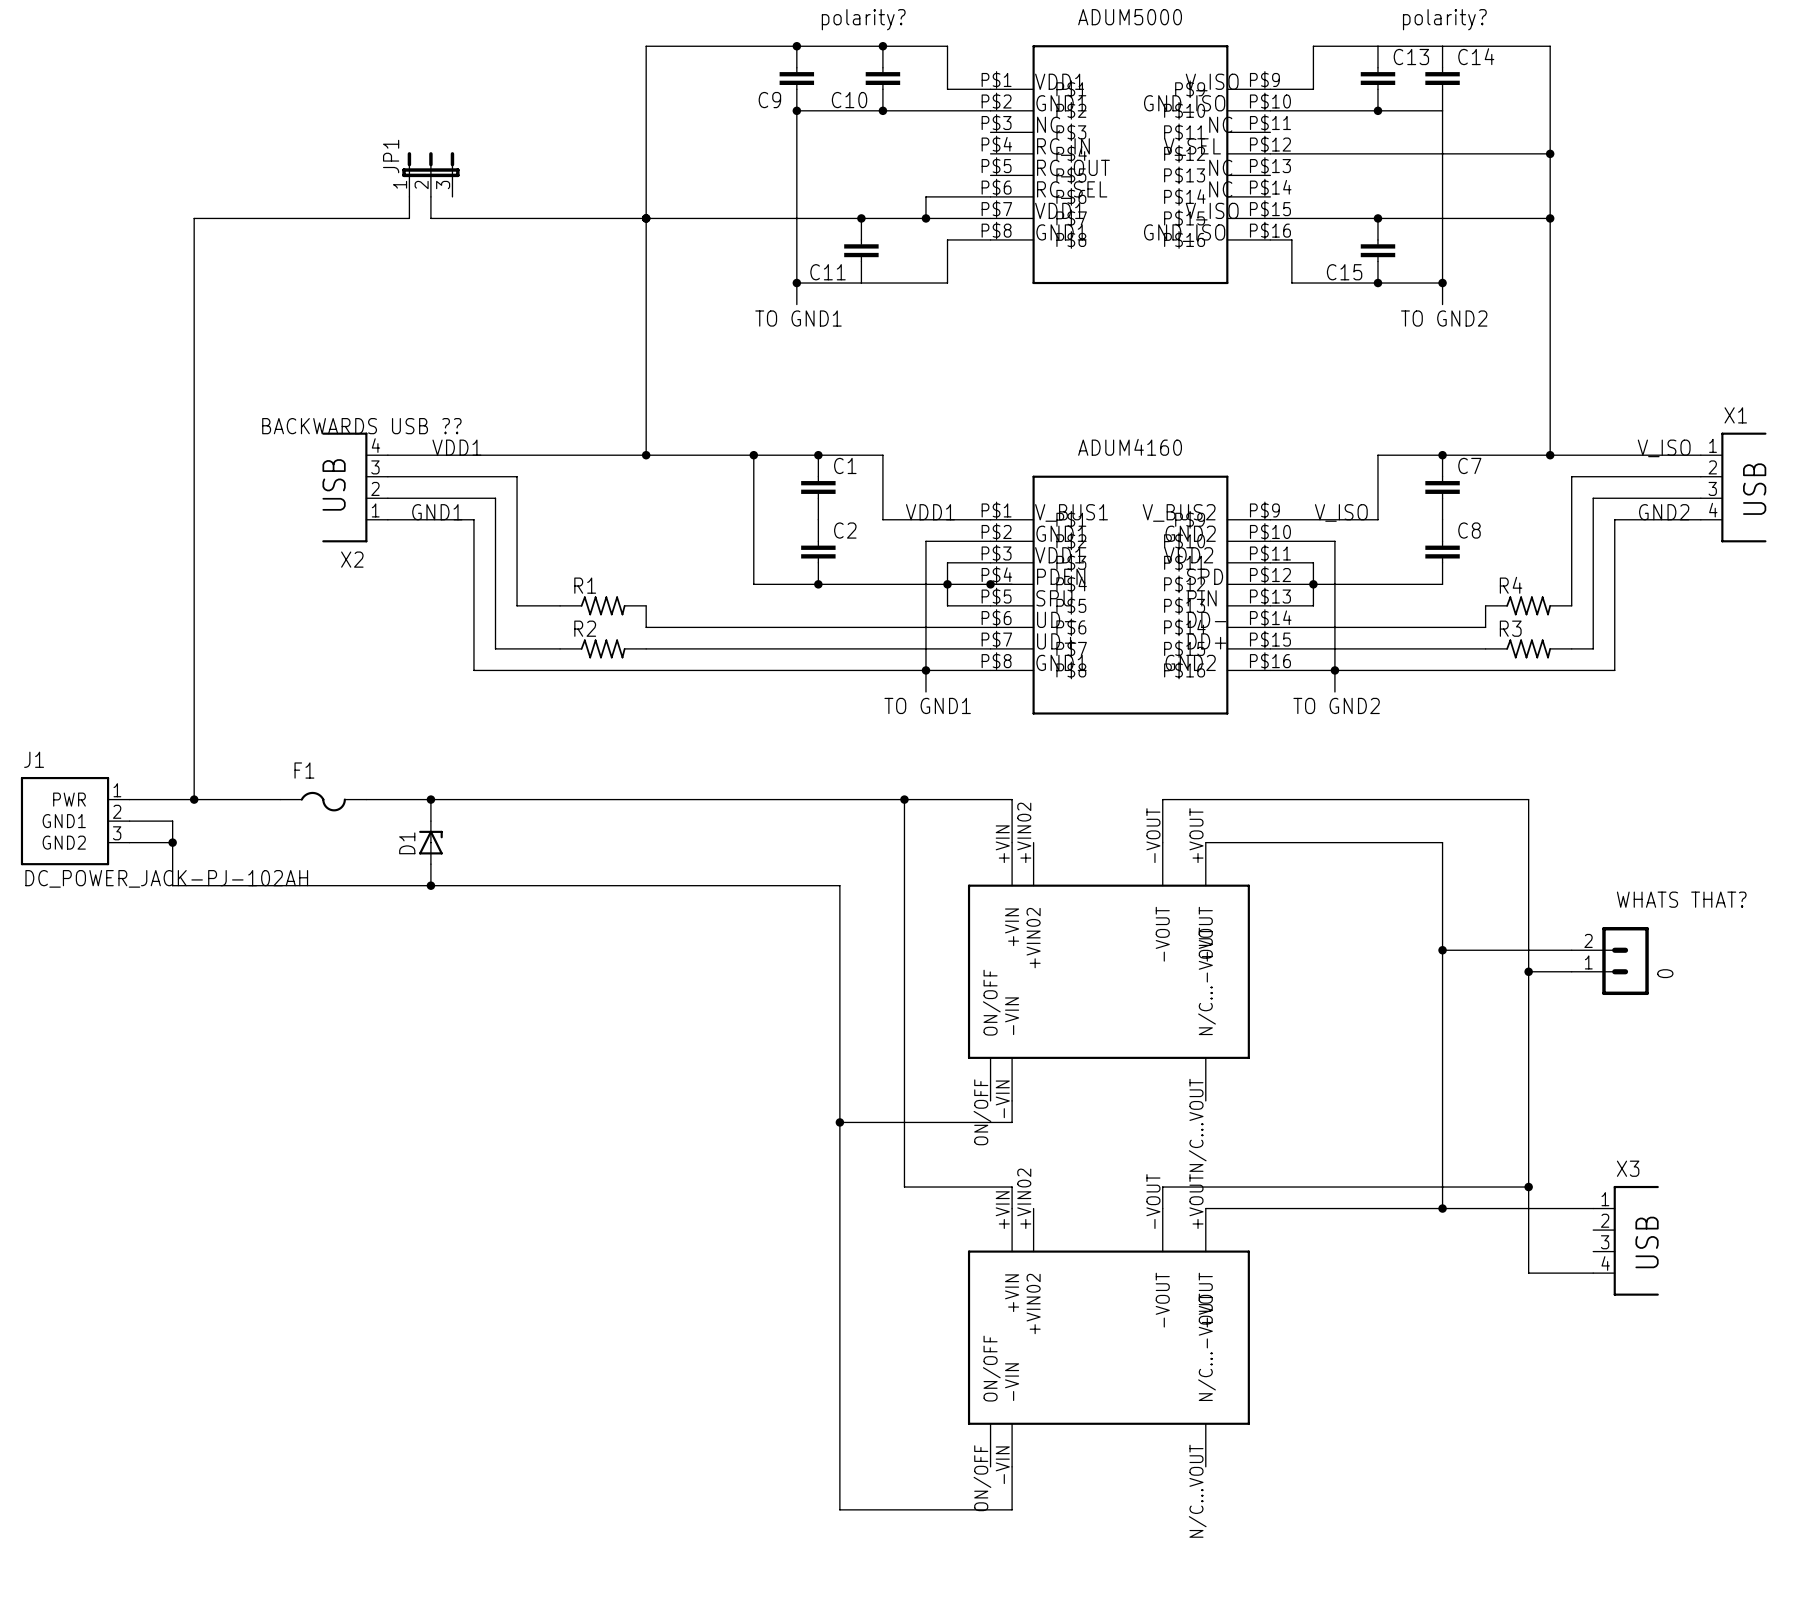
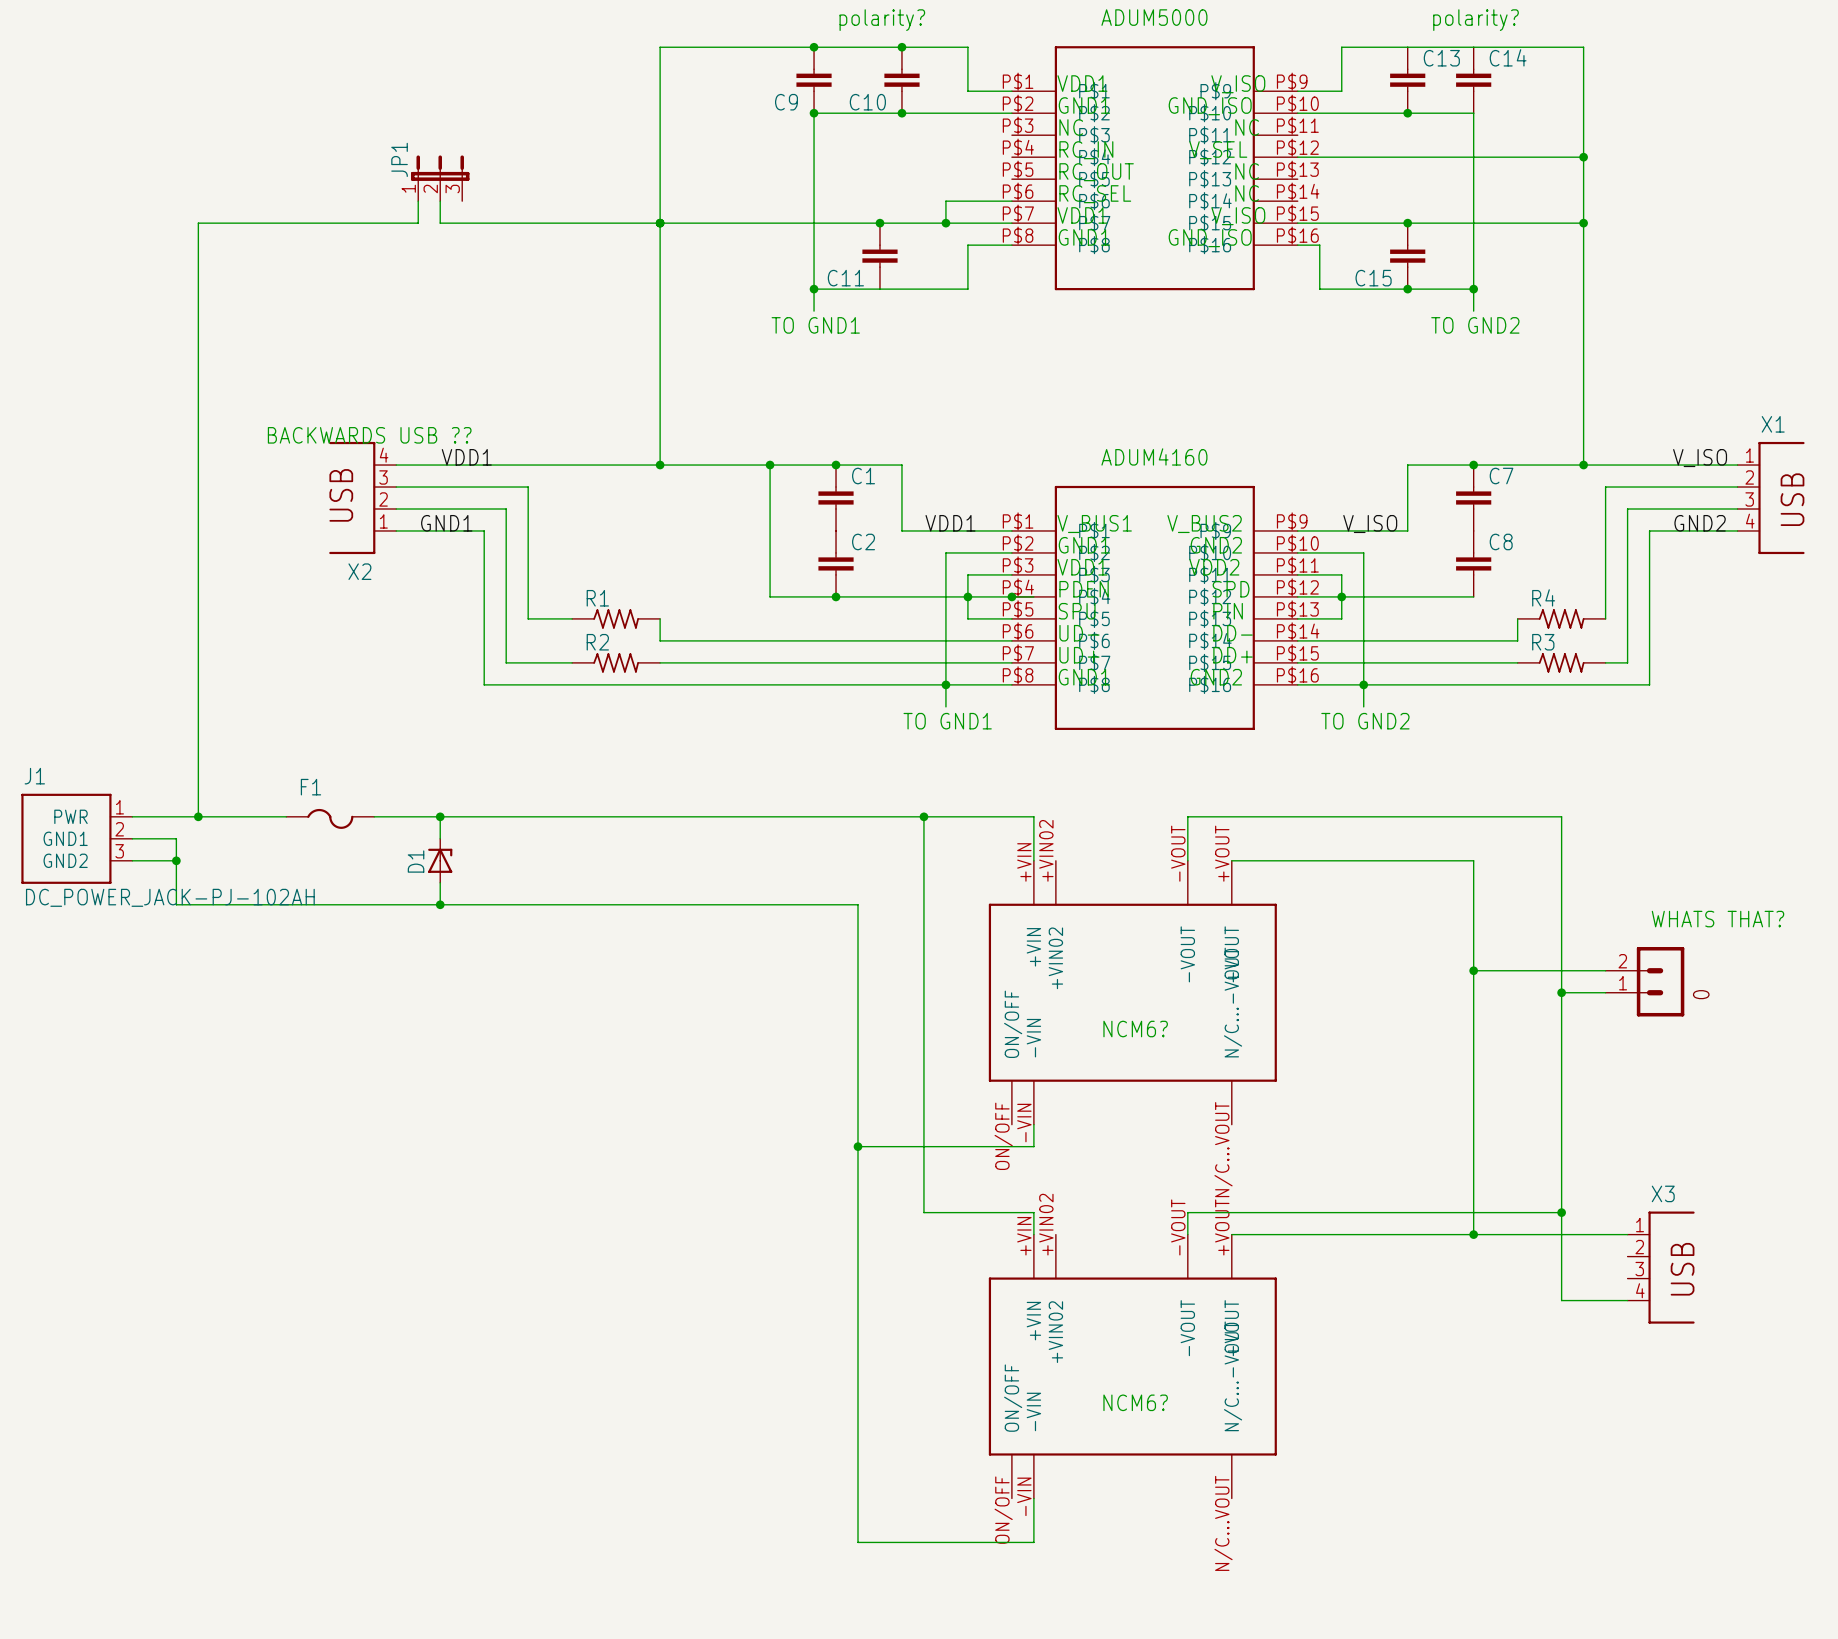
text: none -> NCM6? (1135, 1029)
text: none -> NCM6? (1135, 1402)

